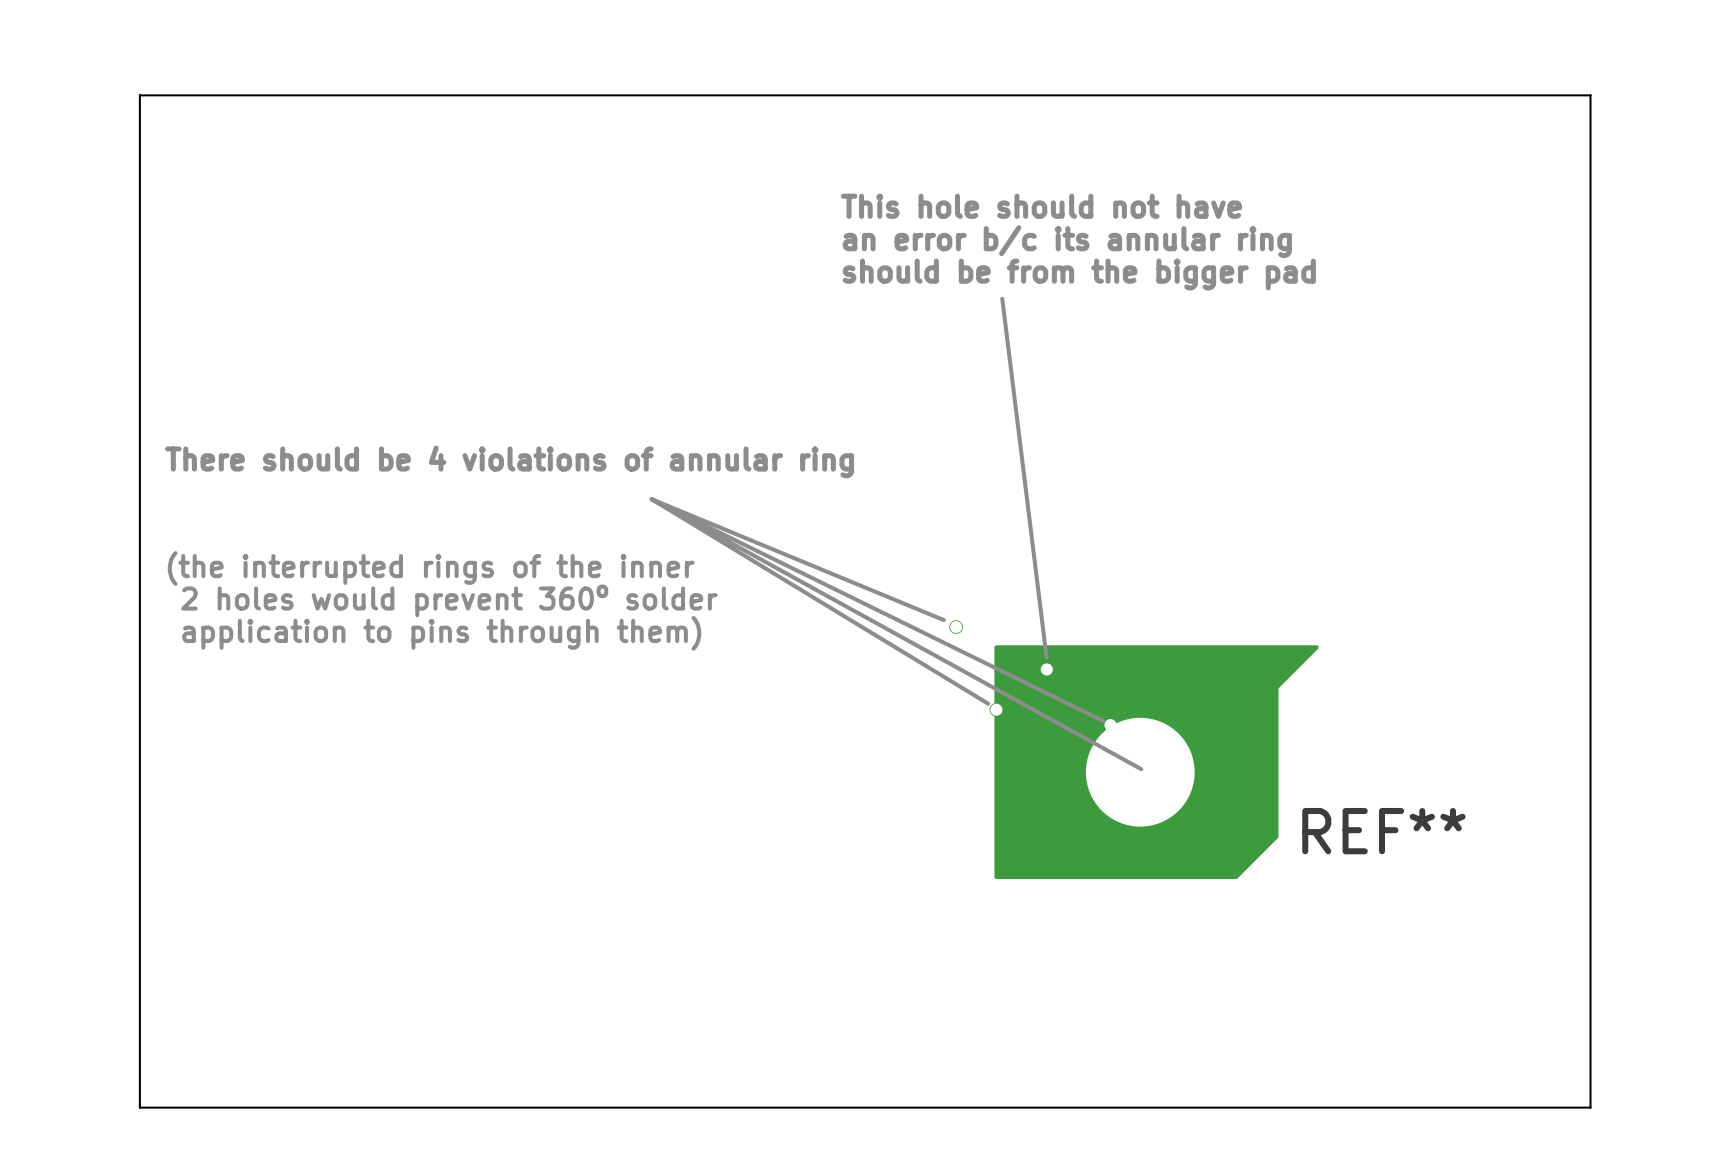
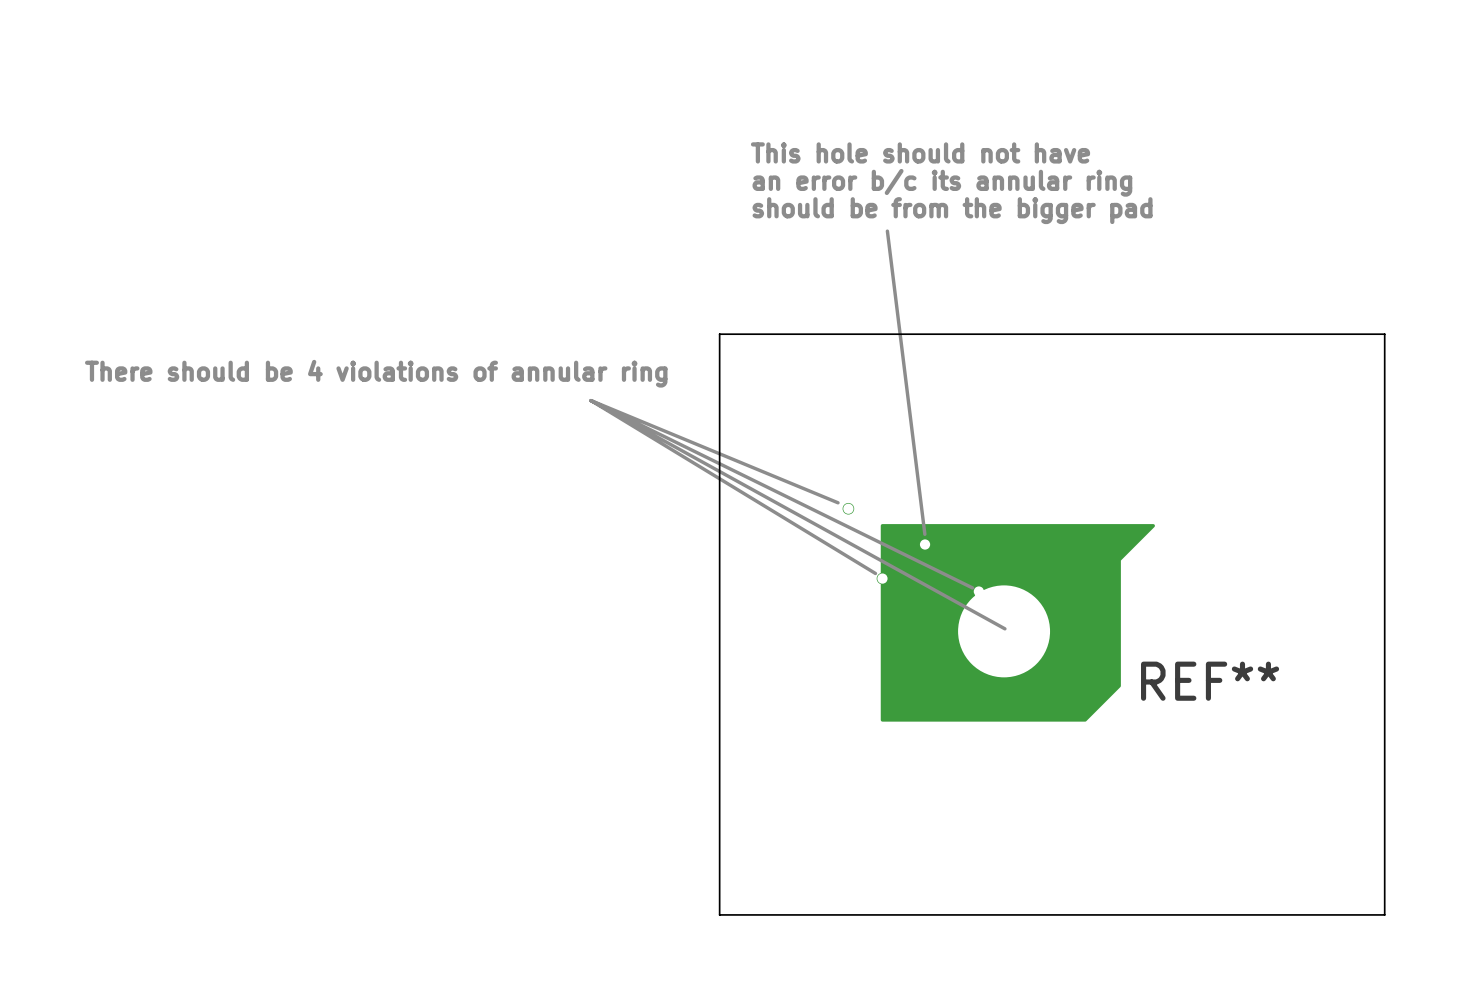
board edge: (1590, 420) (1590, 95) (139, 95) (139, 1107) (803, 1107) -> (1384, 334) (719, 334) (719, 914)
text position: There should be 4 violations of annular ring (509, 461) -> There should be 4 violations of annular ring (376, 373)
text: (the interrupted rings of the inner (431, 568) -> none
text: 2 holes would prevent 360º solder (449, 600) -> none
text: application to pins through them) (441, 633) -> none

